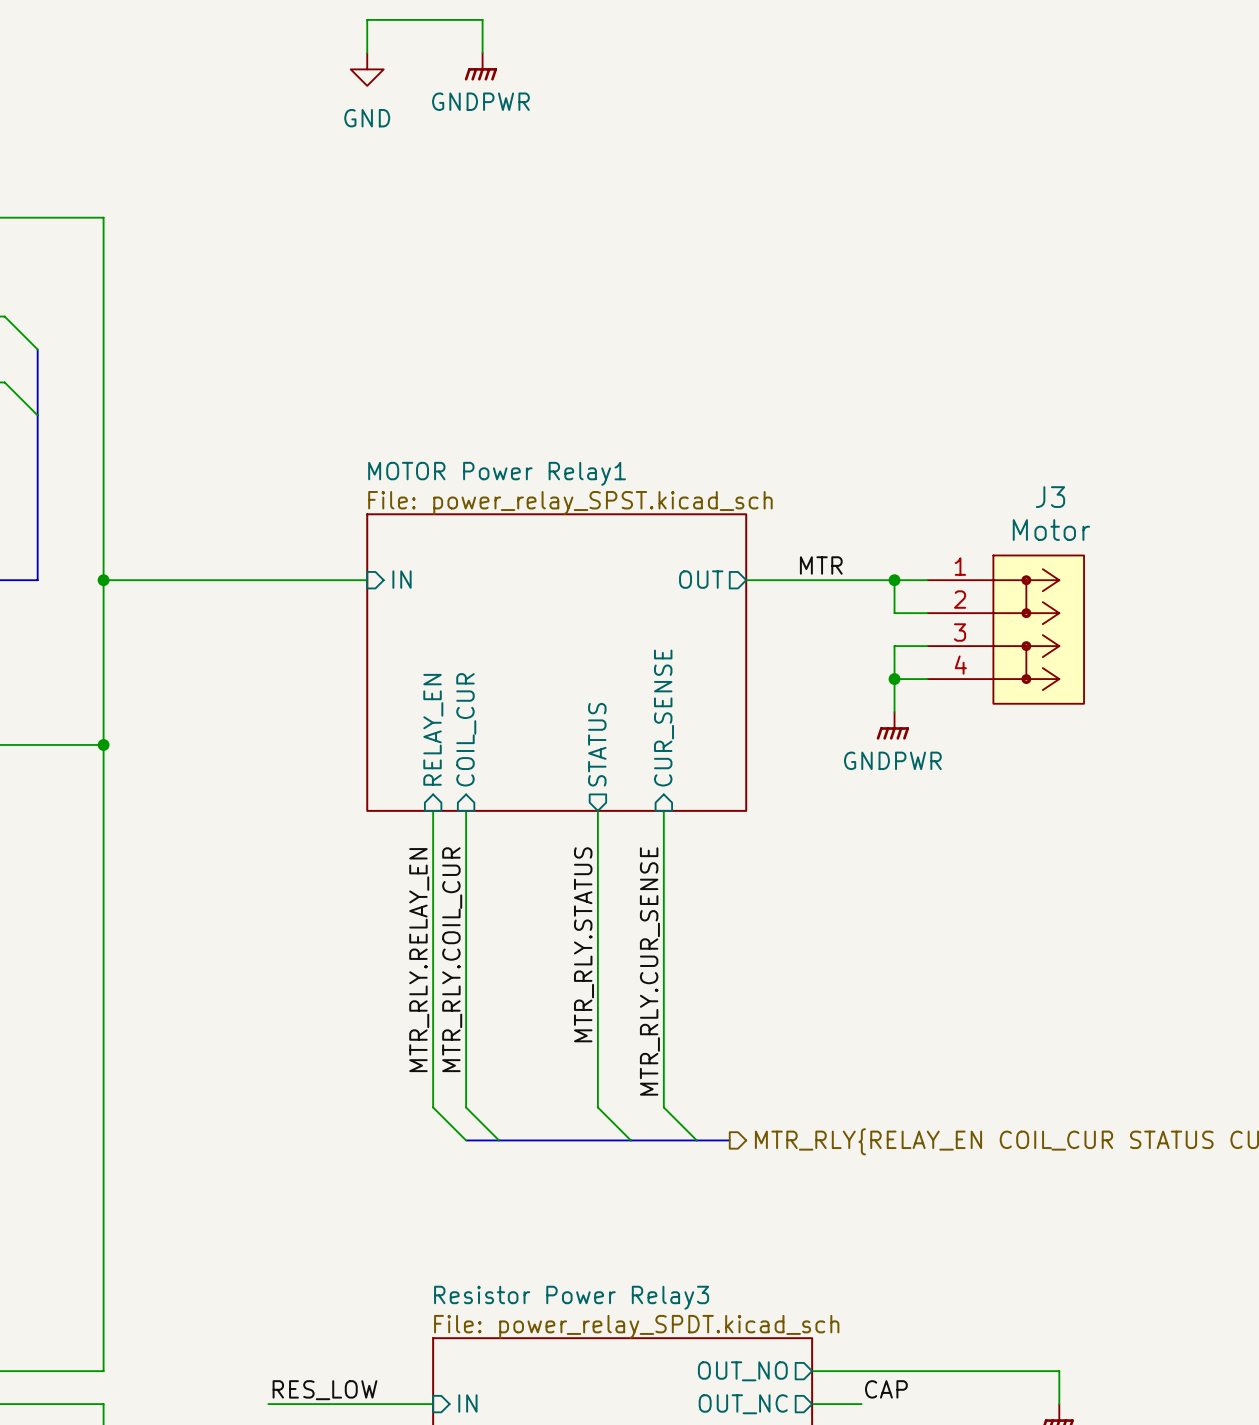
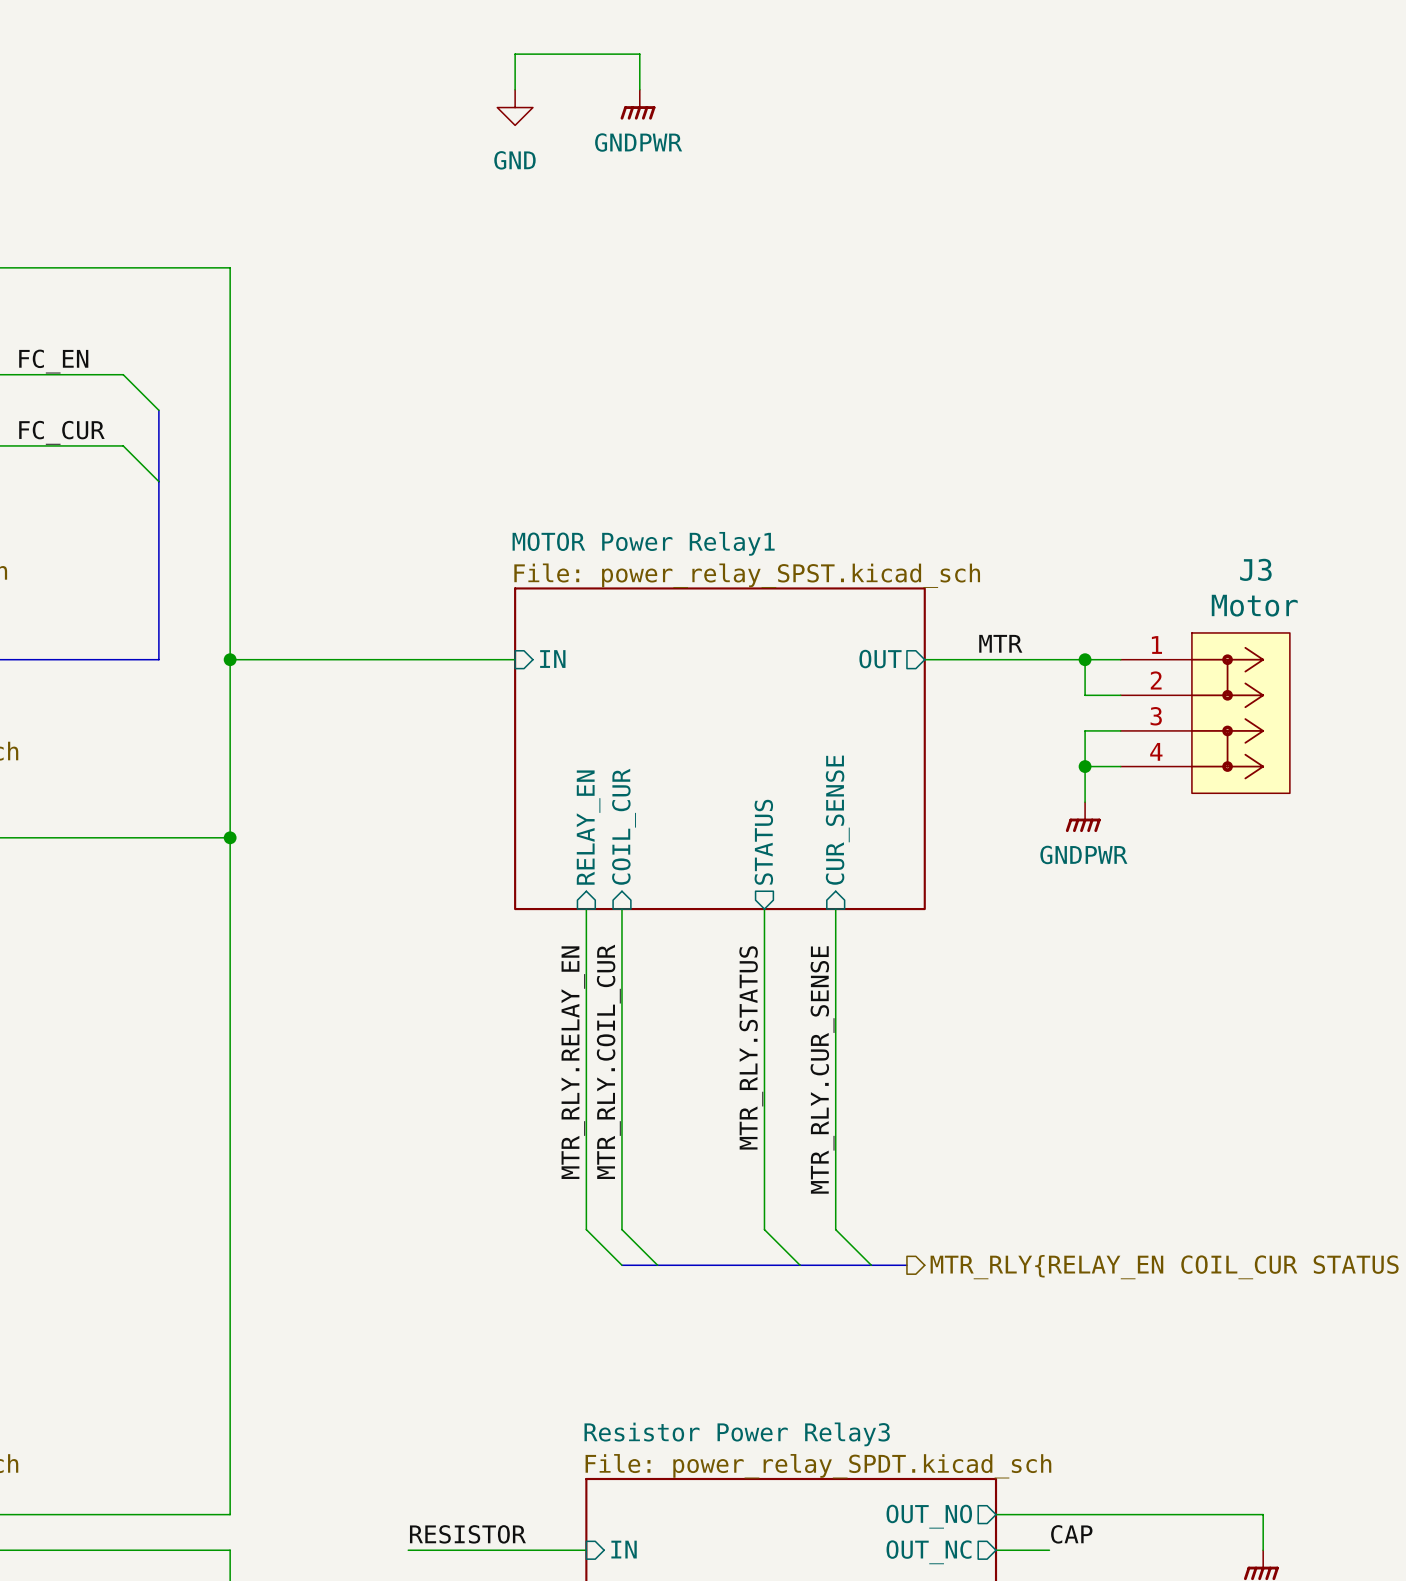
label: RES_LOW (324, 1390) -> RESISTOR (467, 1534)

